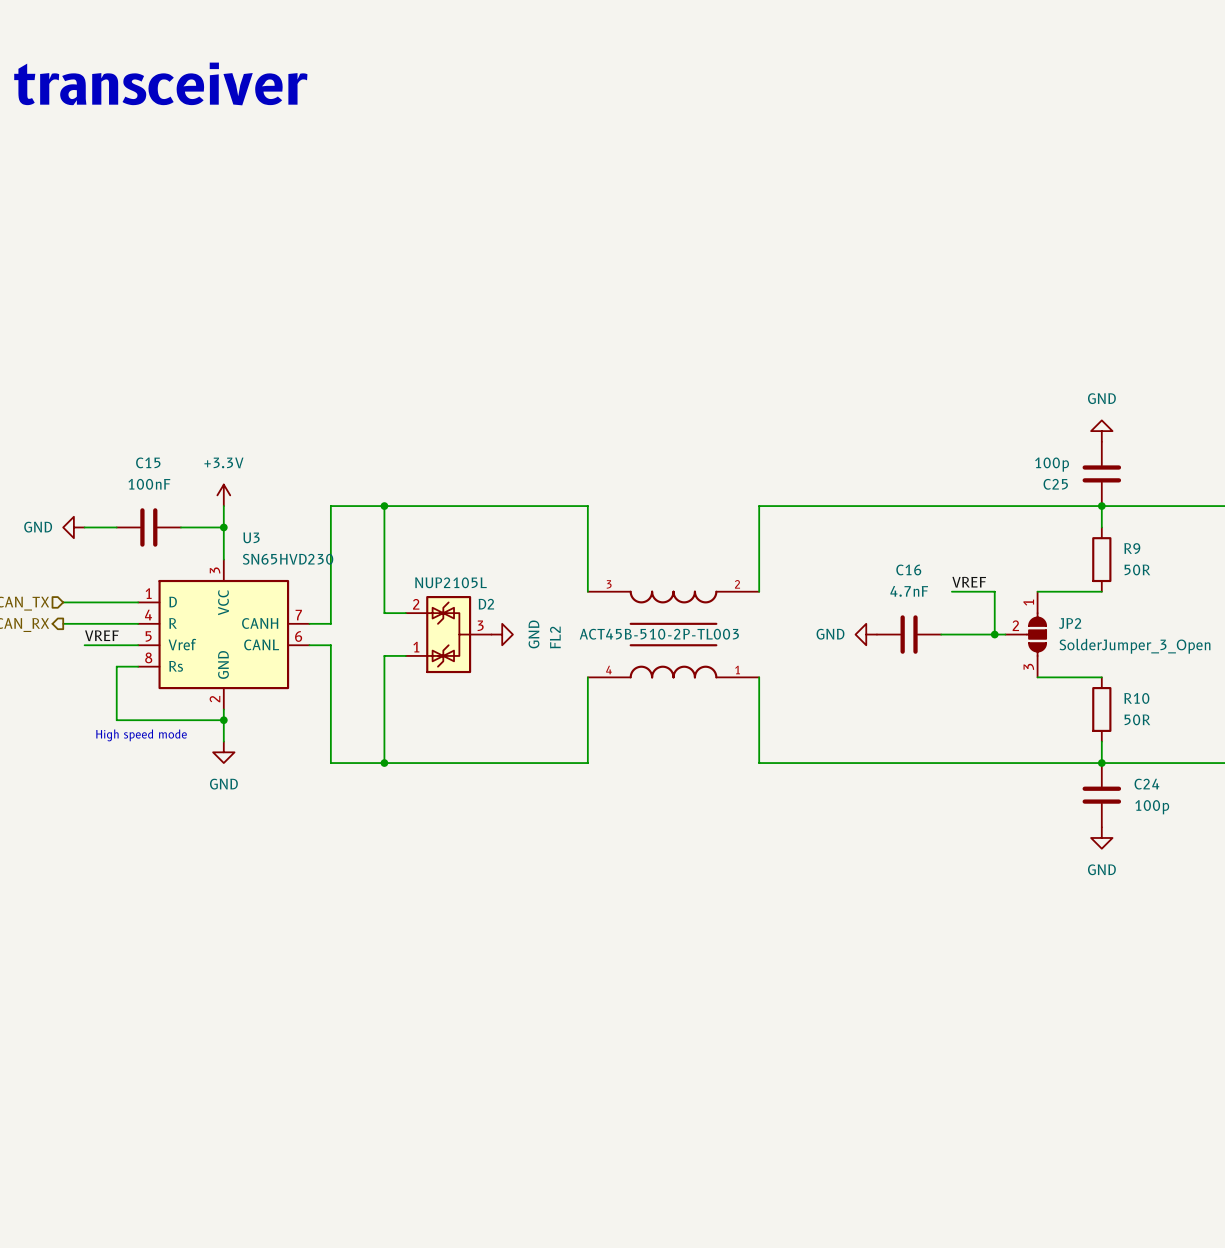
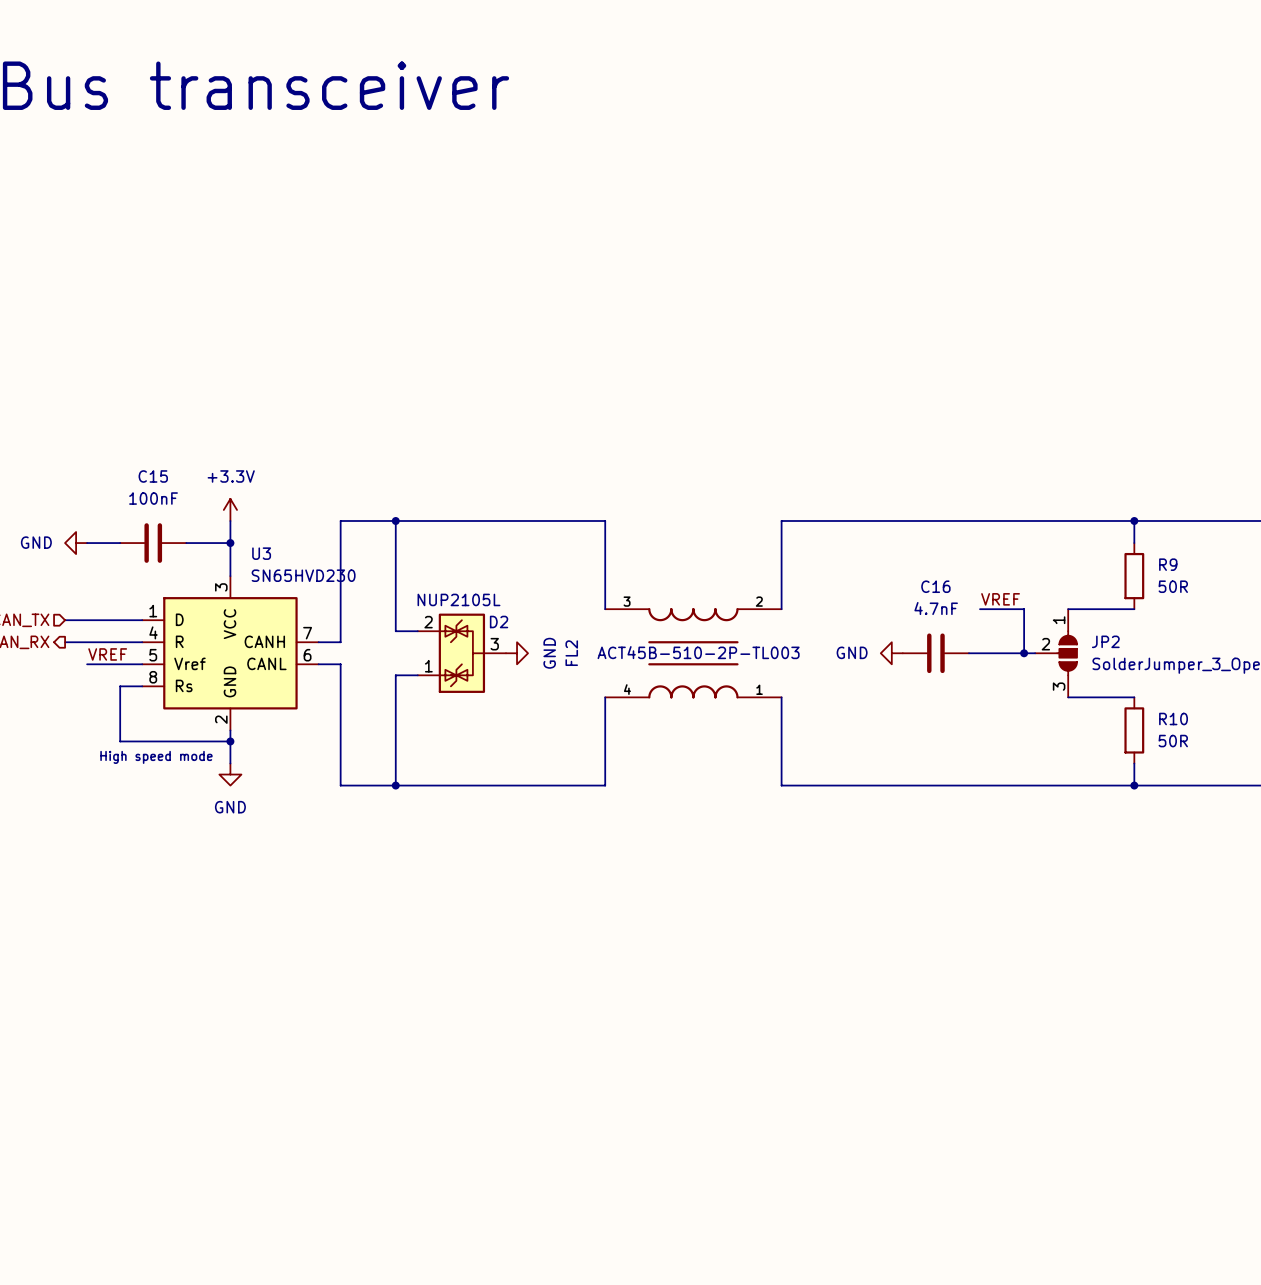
power symbol: GND (1101, 431) -> none
C25: 100p (1101, 473) -> none
C24: 100p (1101, 795) -> none
power symbol: GND (1101, 837) -> none

